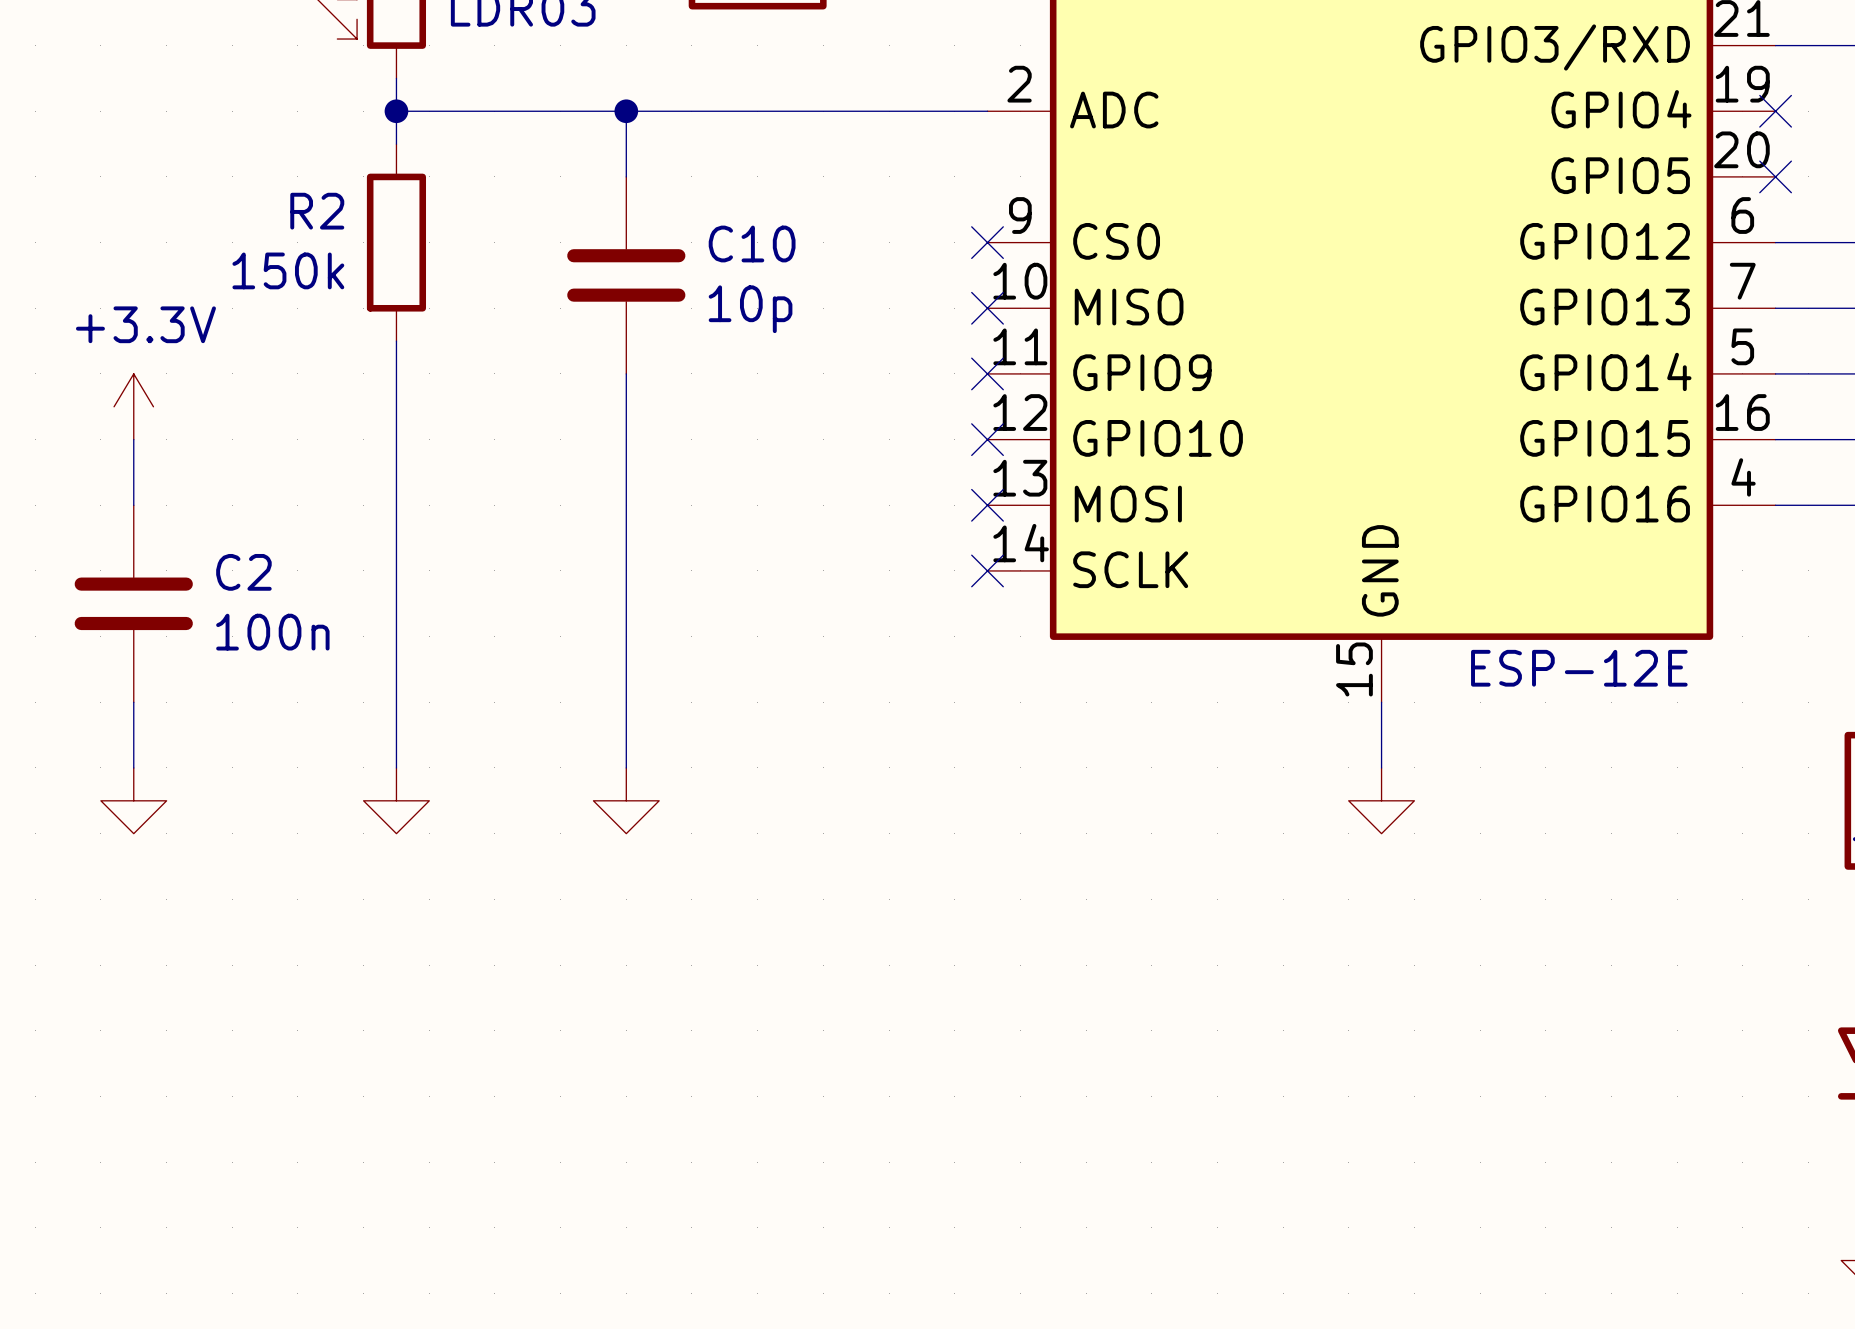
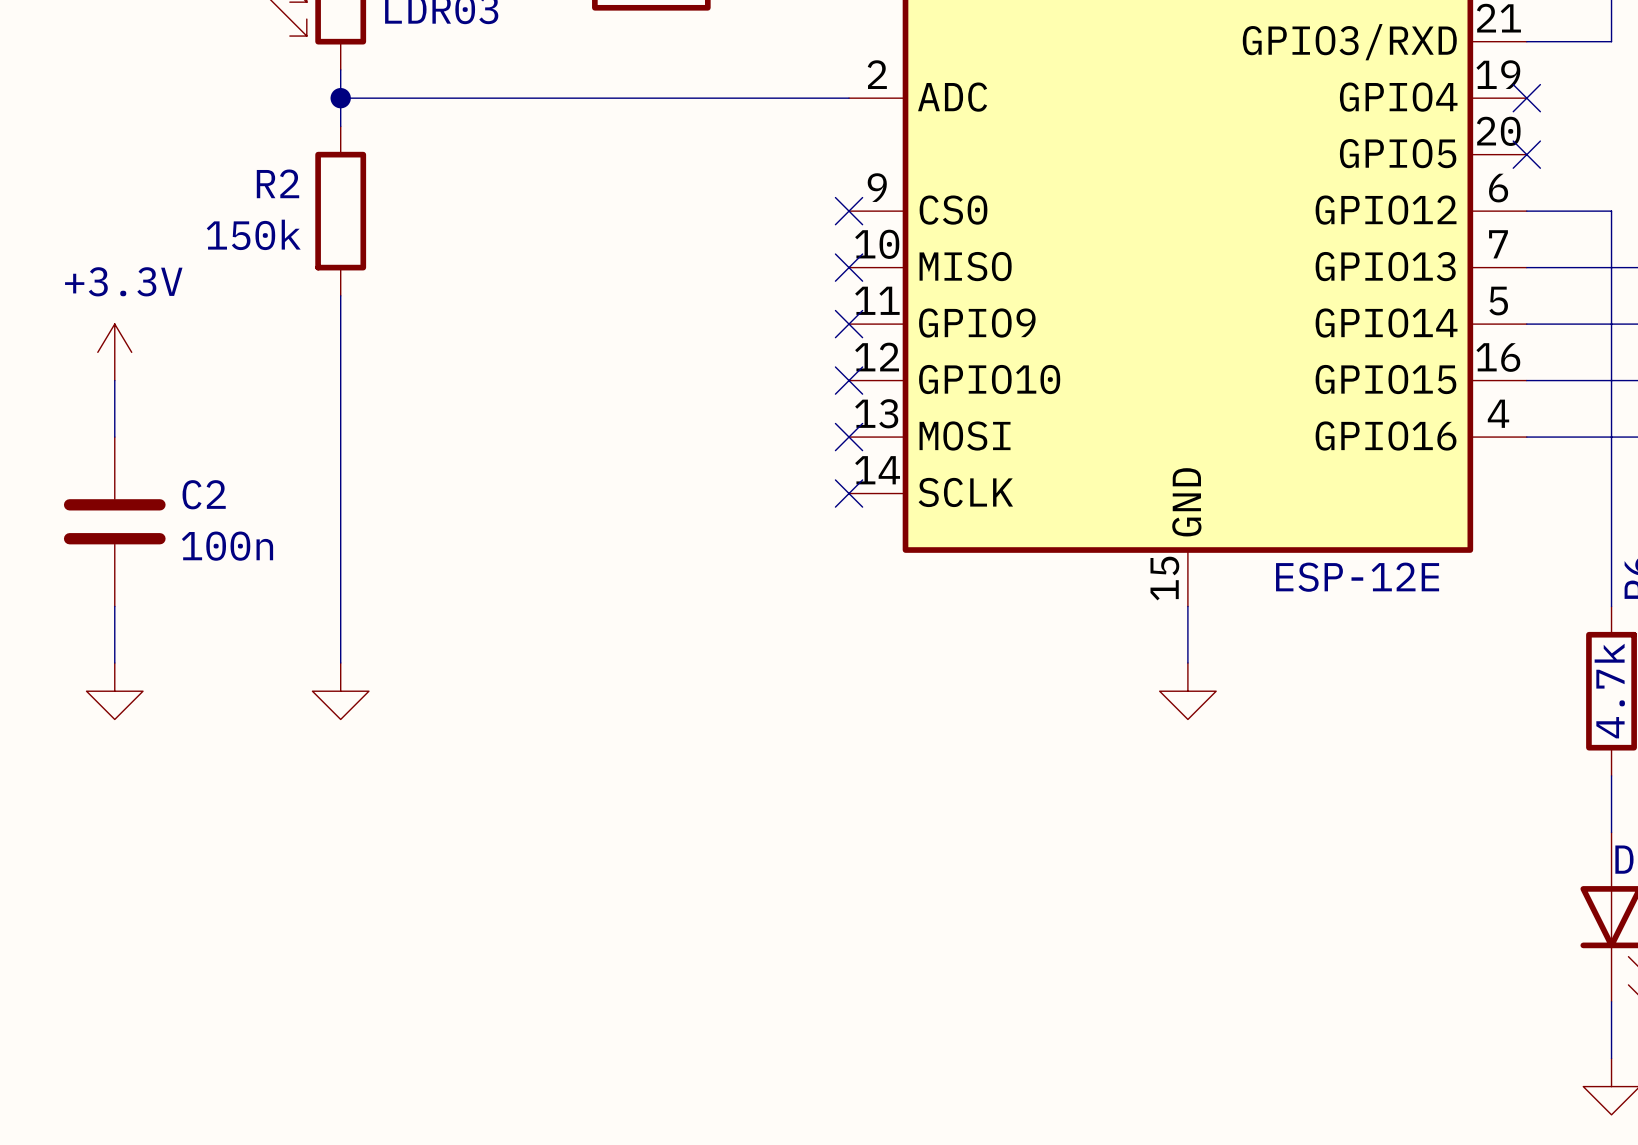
wire: (626, 111) (626, 176) -> none
junction: (626, 111) -> none
C10: 10p (626, 275) -> none
wire: (626, 373) (626, 767) -> none
power symbol: (626, 800) -> none

